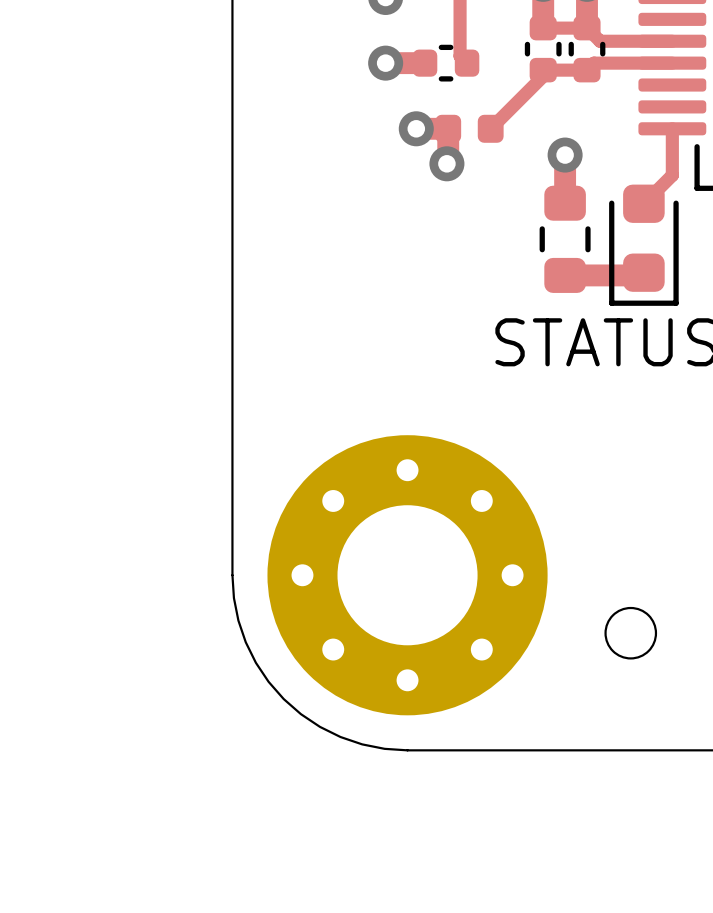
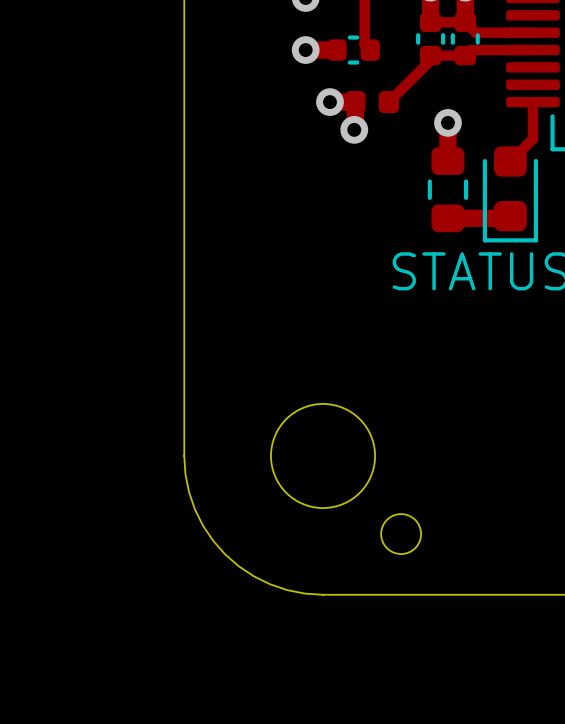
round board edge: none -> [270, 403, 376, 509]
part: (407, 575) -> none
round board edge position: (630, 633) -> (401, 534)

